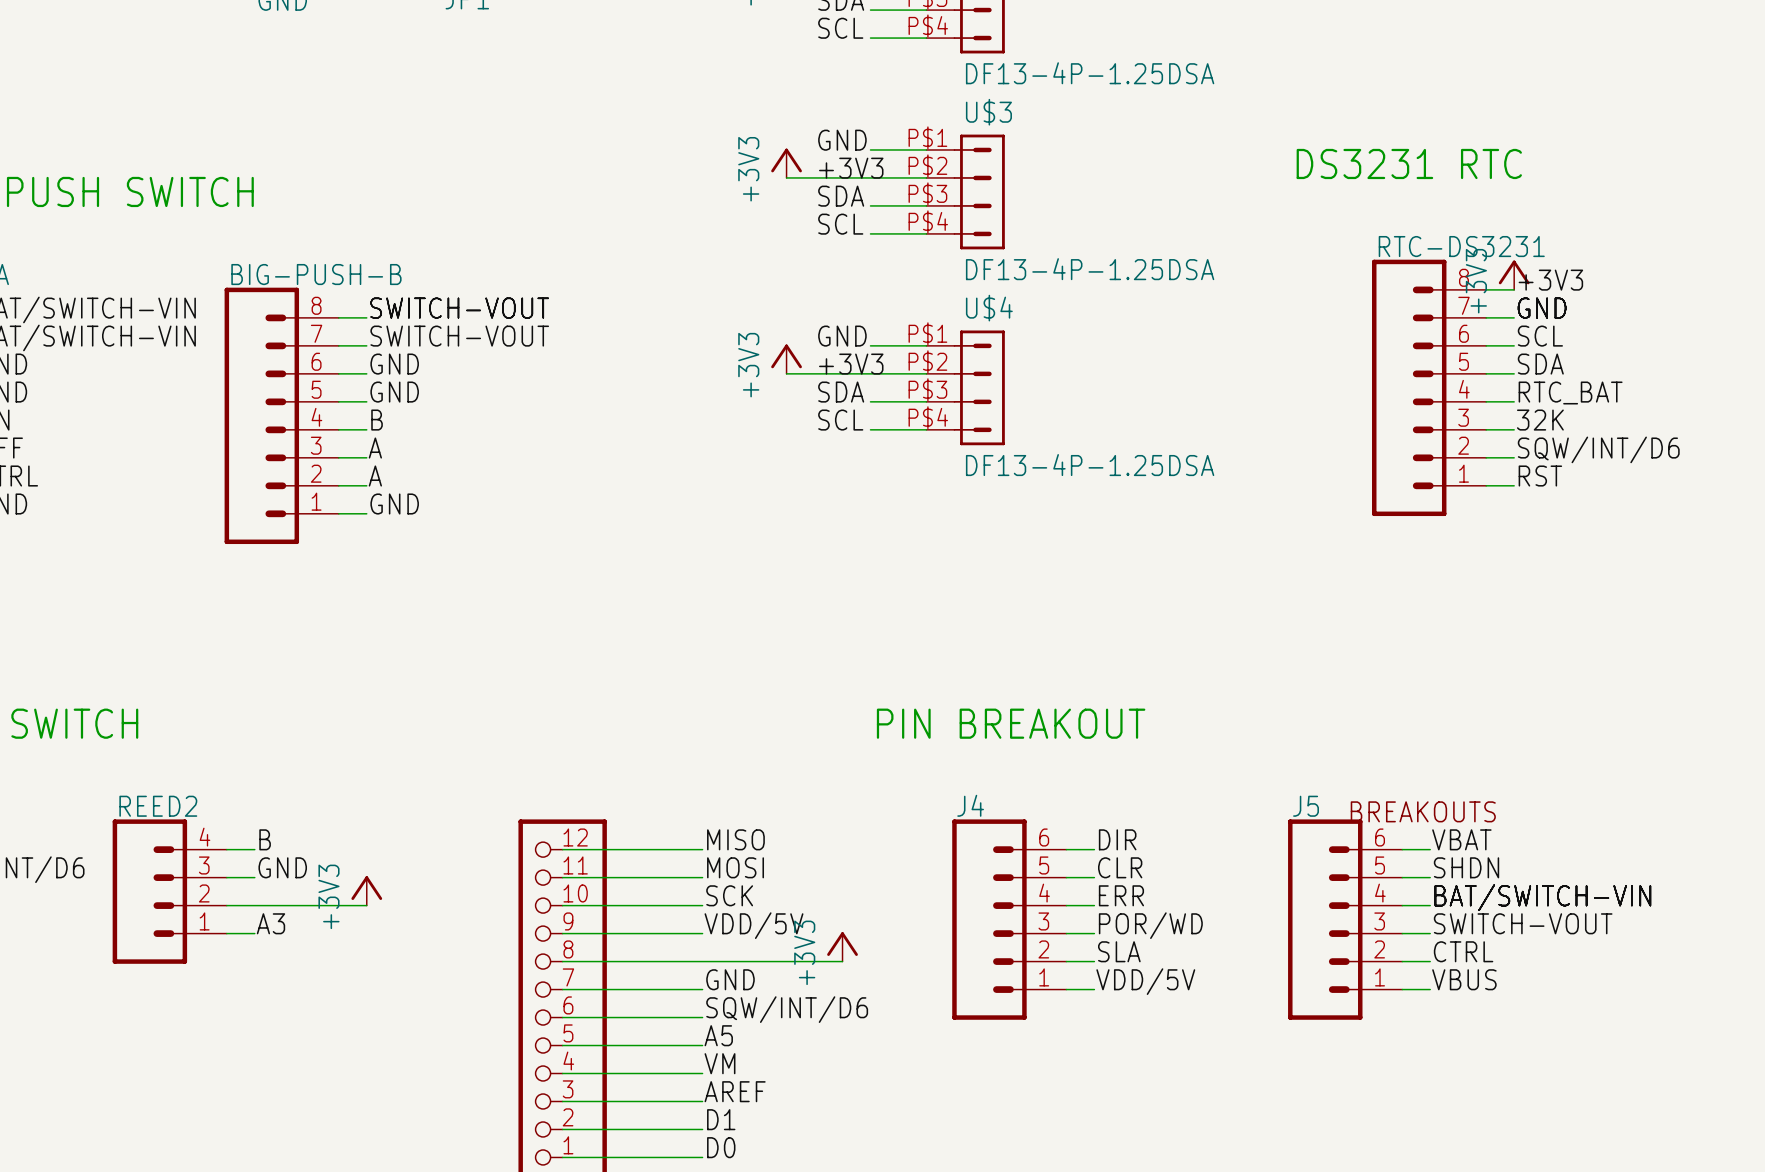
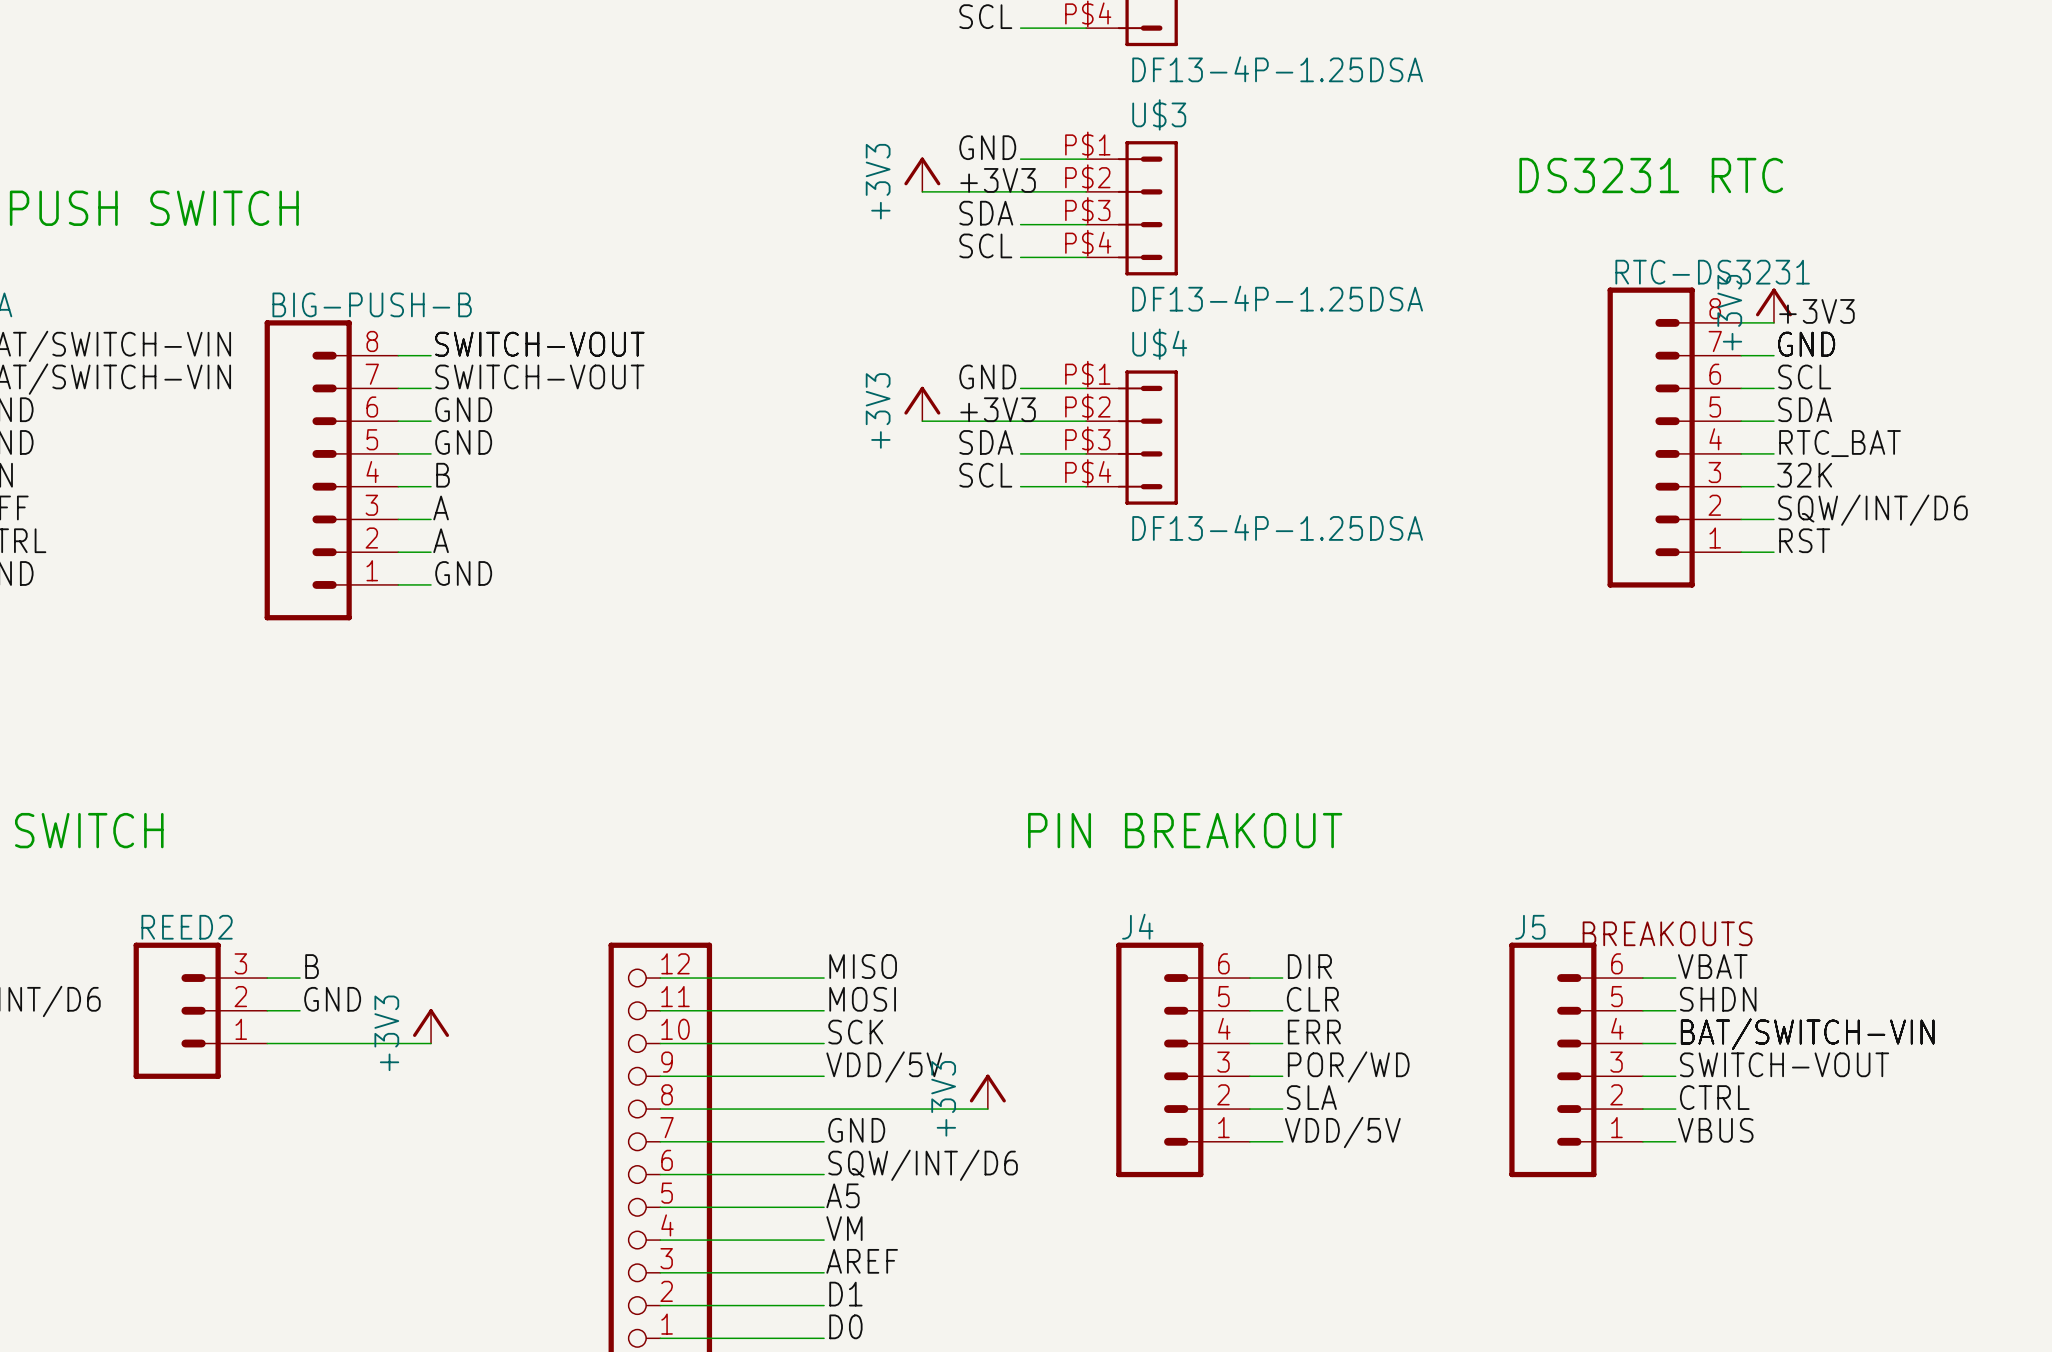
REED2 symbol: [112, 819, 227, 964] -> [133, 942, 268, 1079]
label: A3 (270, 923) -> none
wire: (226, 933) (254, 933) -> none

